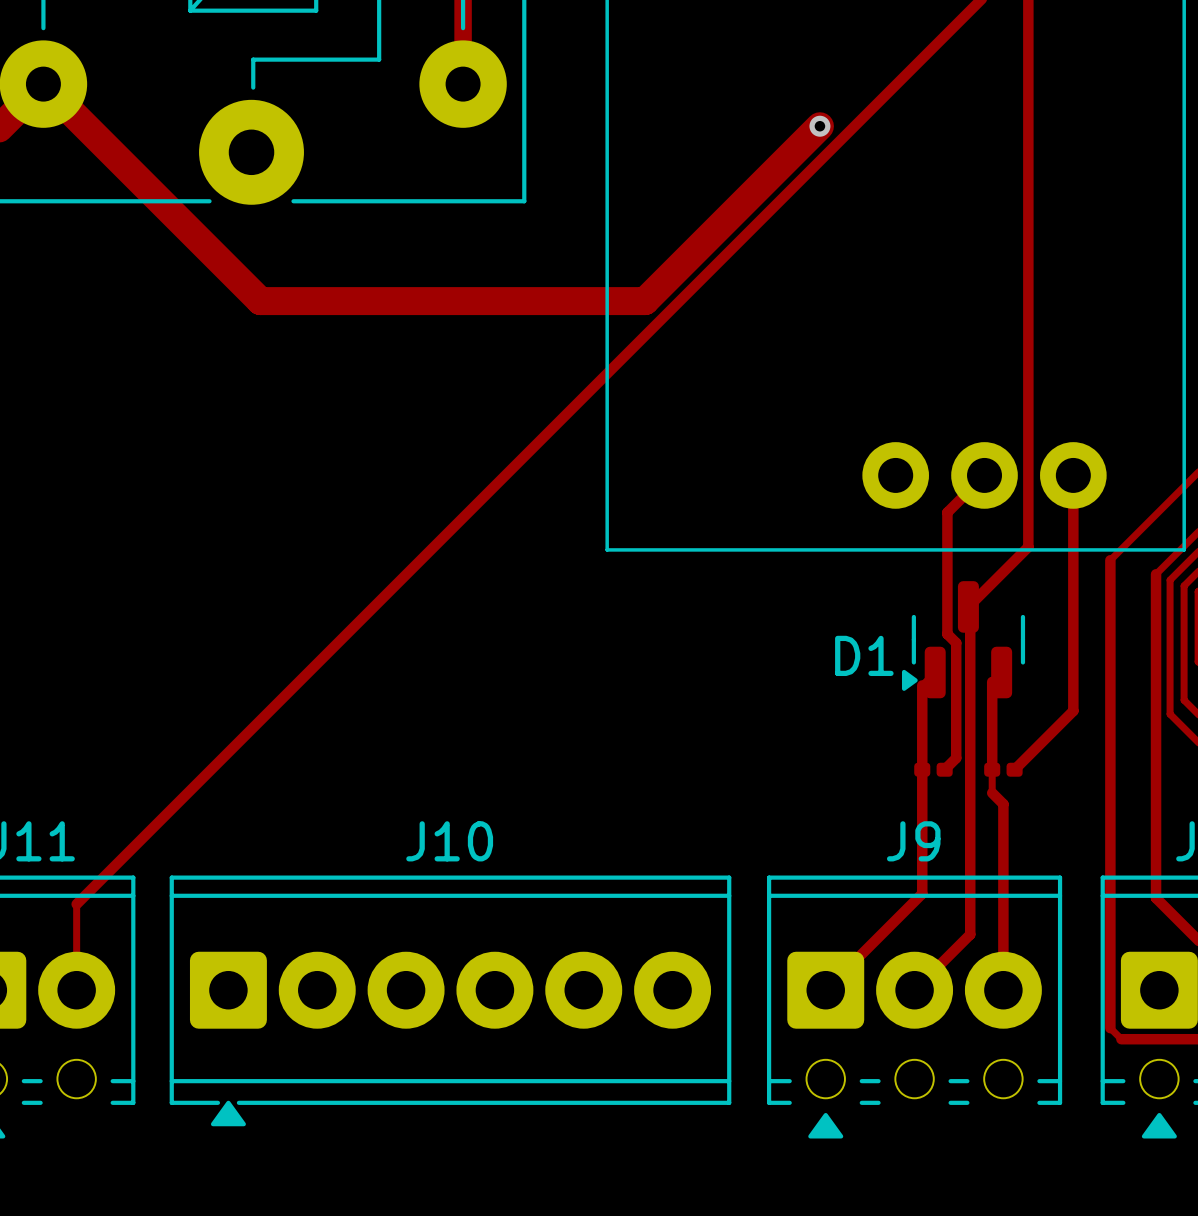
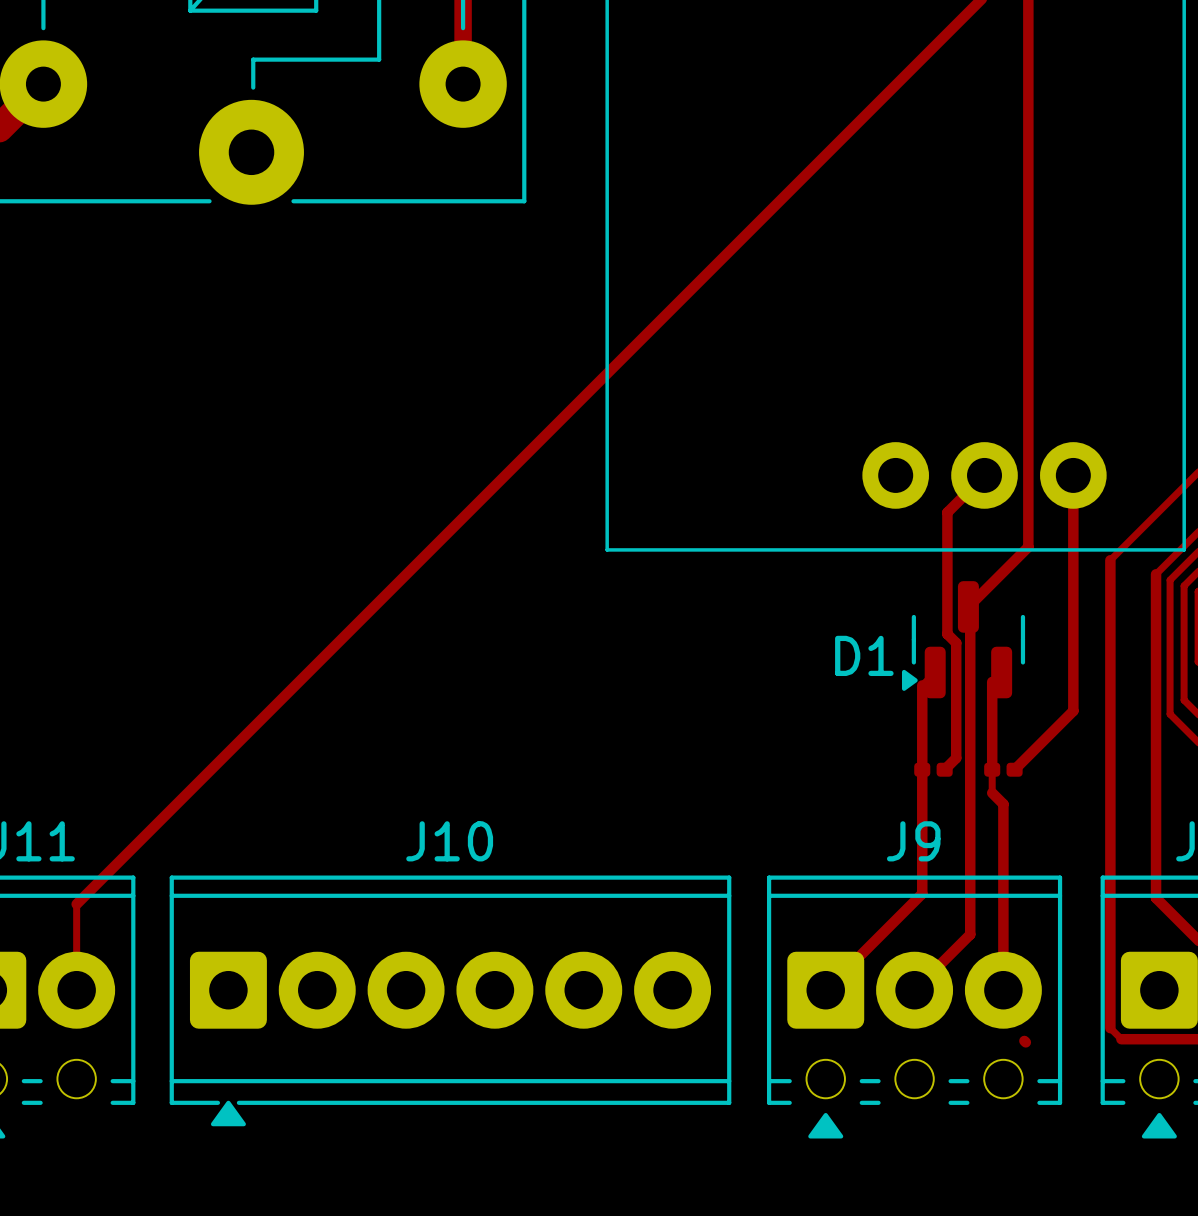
track: (43, 84) (260, 301) (645, 301) (819, 126) -> none
via: (819, 126) -> none
track: none -> (1024, 1040) (1025, 1042)

